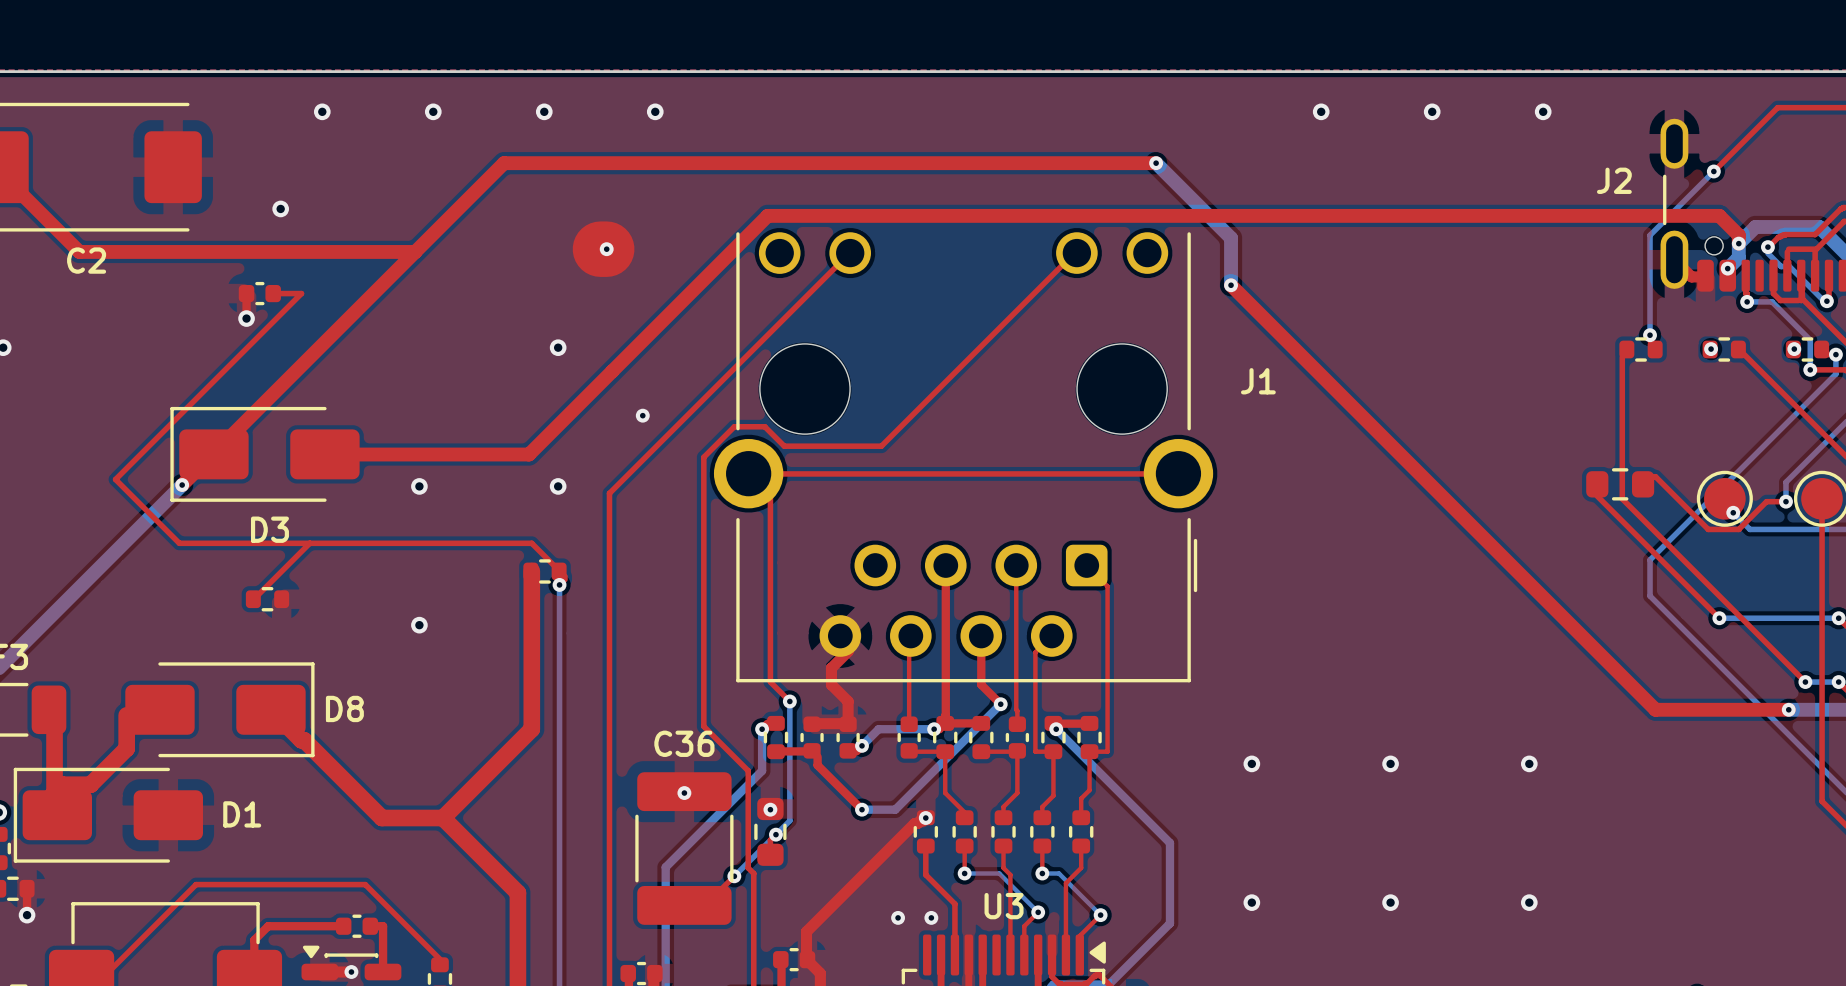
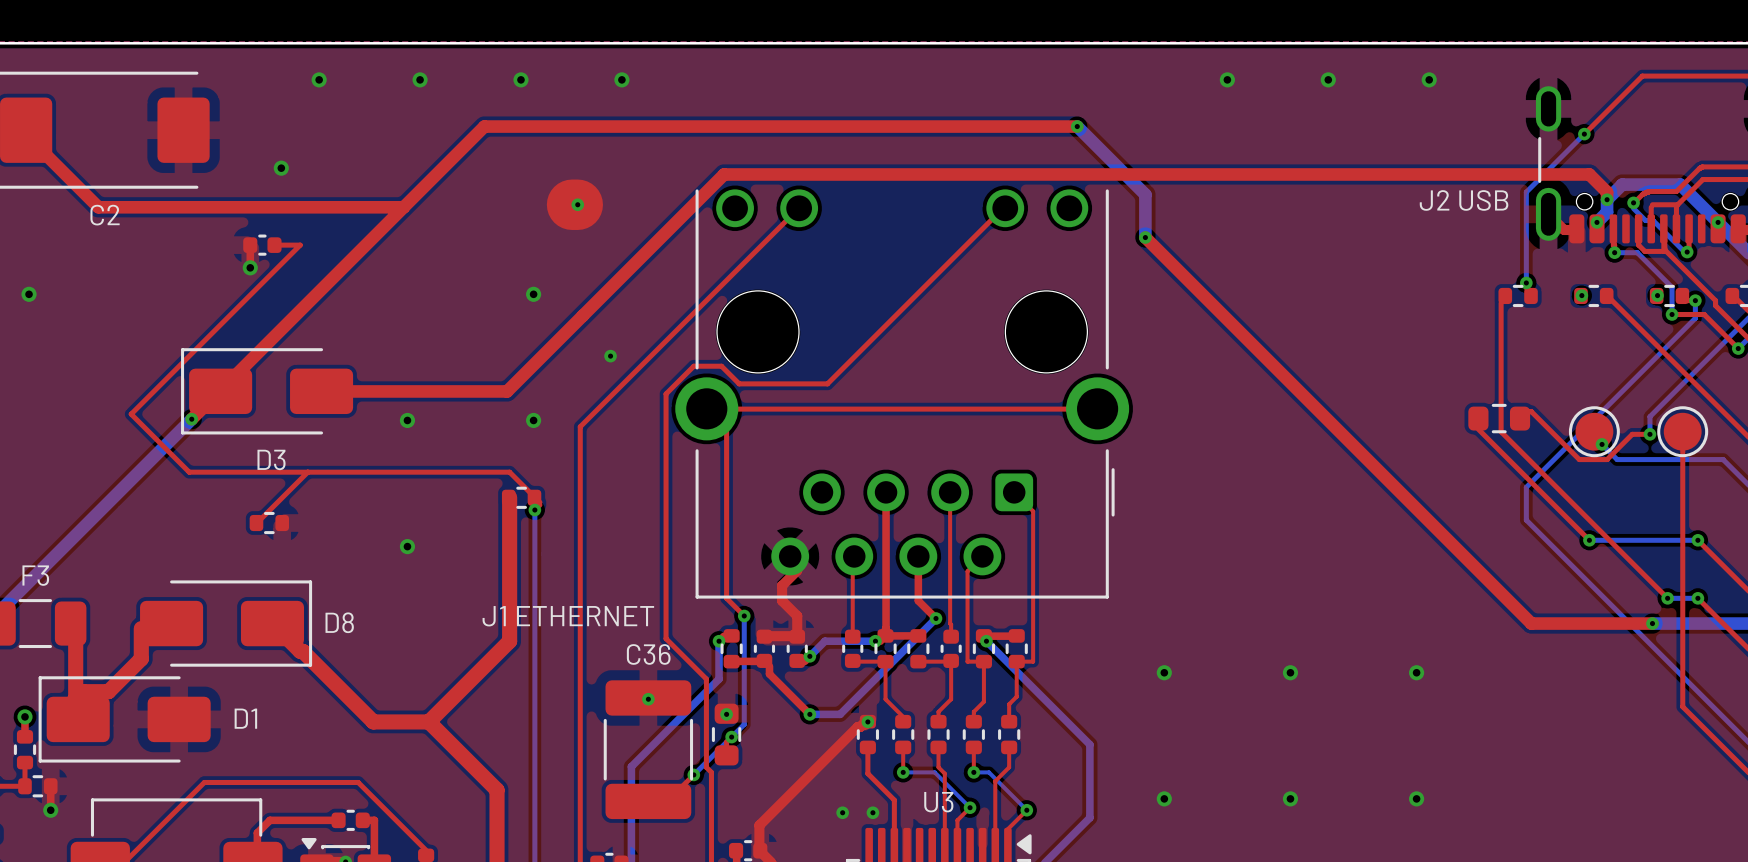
J2 name: J2 (1614, 180) -> none
text: none -> J2 USB (1464, 200)
J1 name: J1 (1258, 381) -> none
text: none -> J1 ETHERNET (568, 616)

